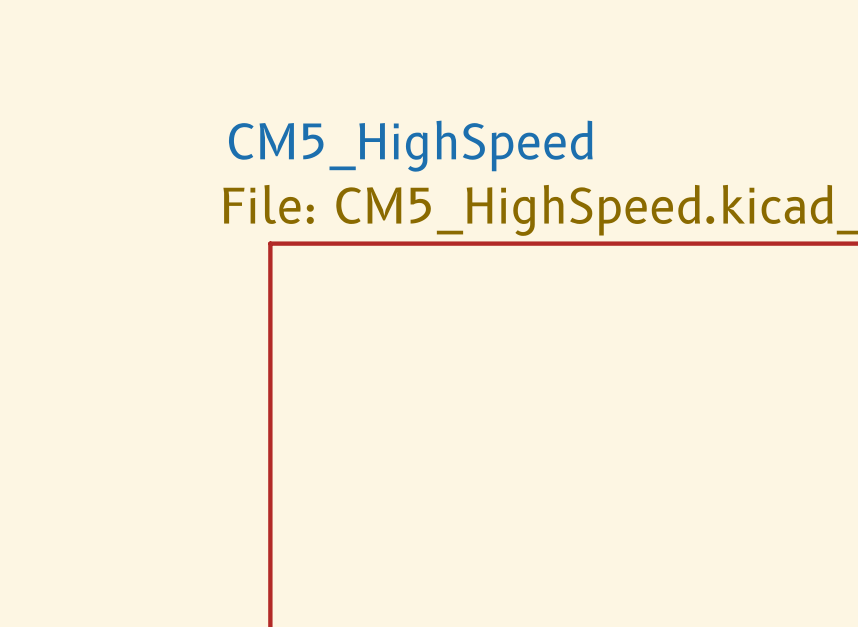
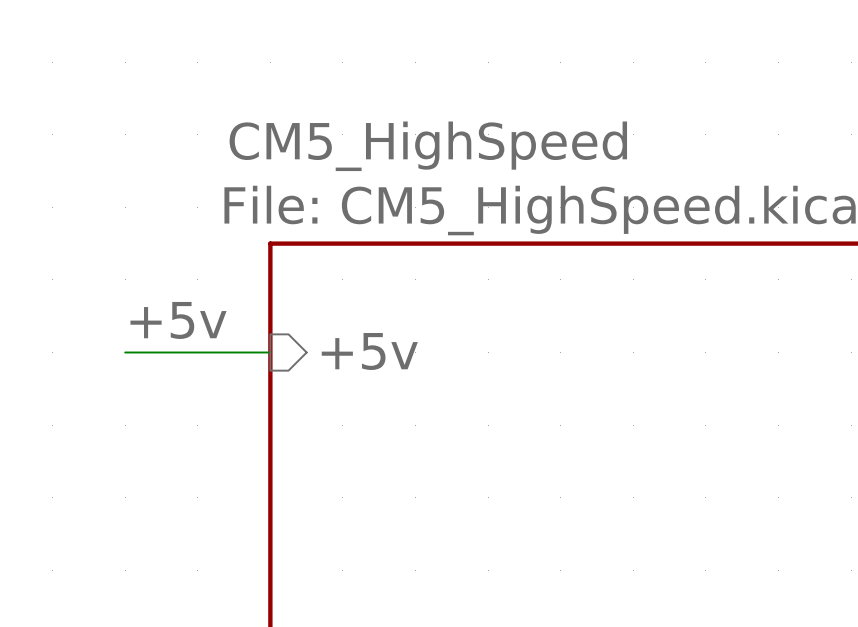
label: none -> +5v (178, 320)
sheet pin: none -> +5v (369, 351)
wire: none -> (125, 352) (270, 352)

